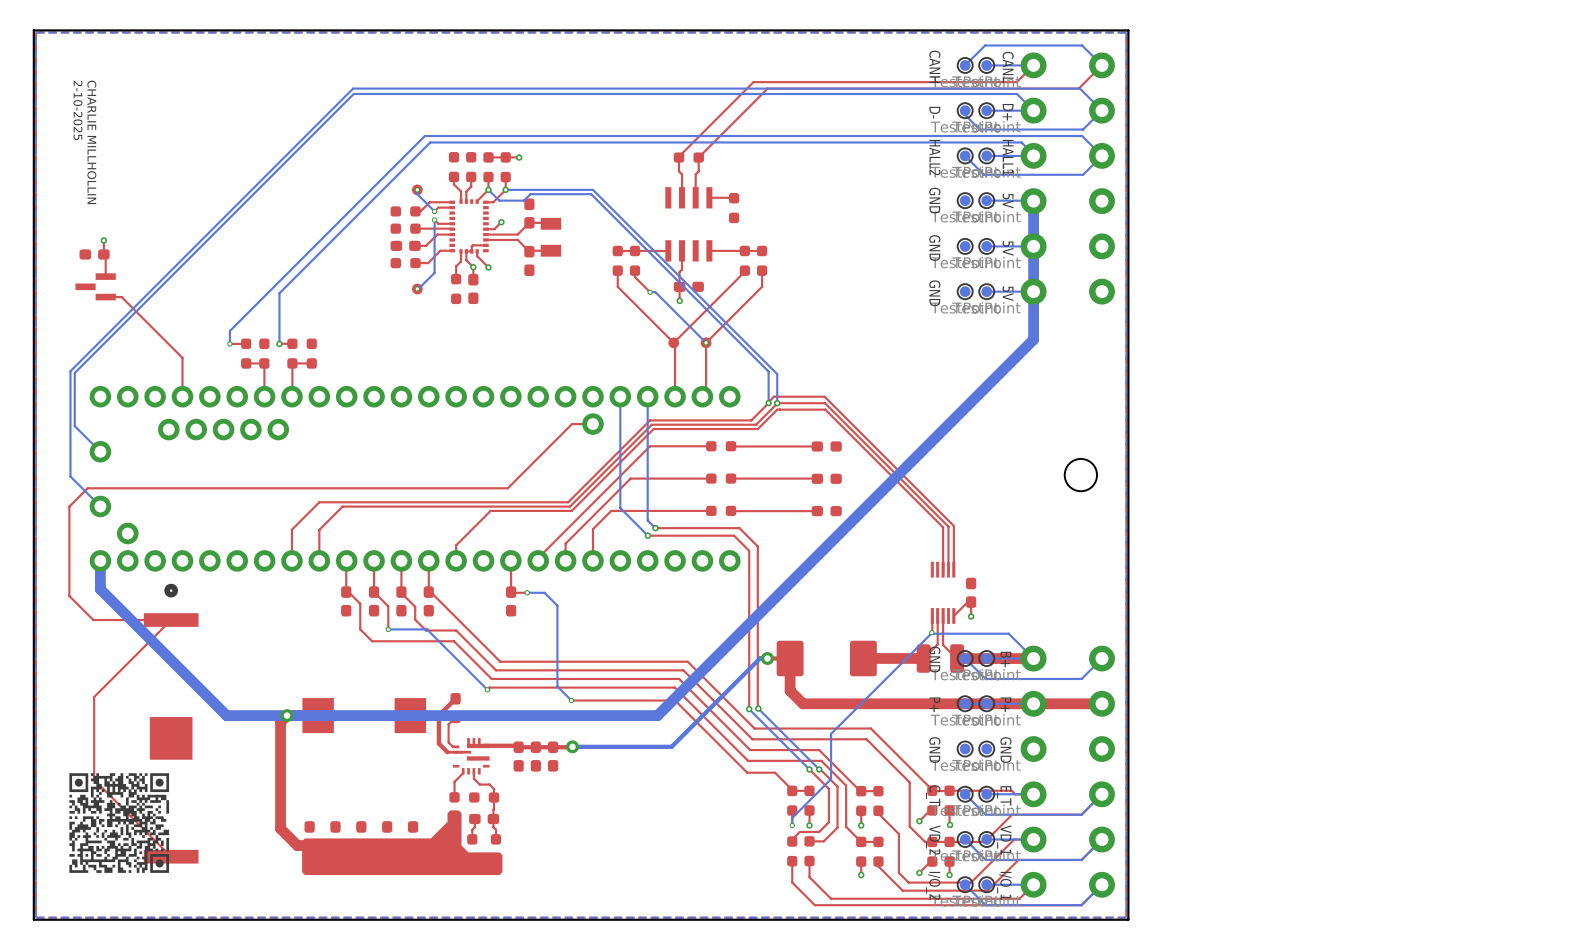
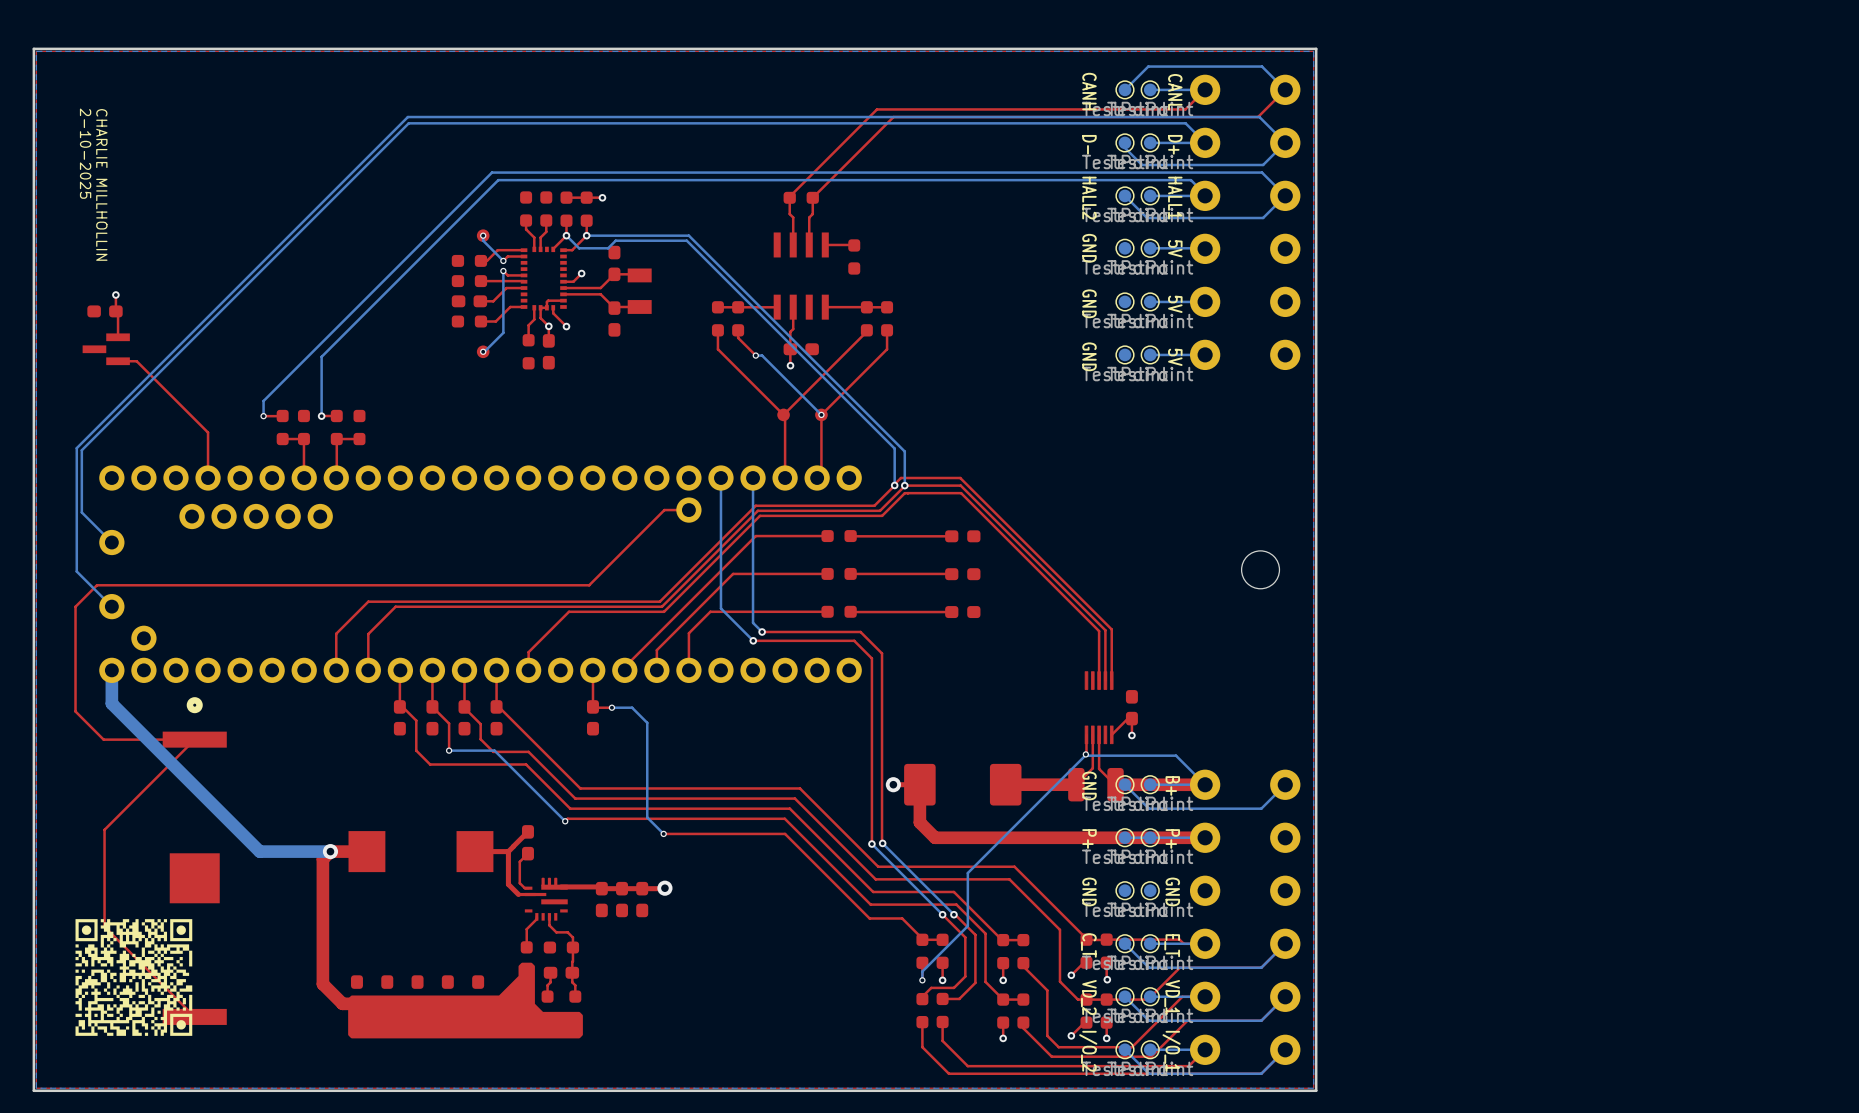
bottom track: (1033, 201) (1033, 339) (657, 715) (287, 715) -> none
bottom track: (767, 658) (759, 658) (671, 746) (572, 746) -> none
top track: (1102, 703) (1033, 703) -> none

